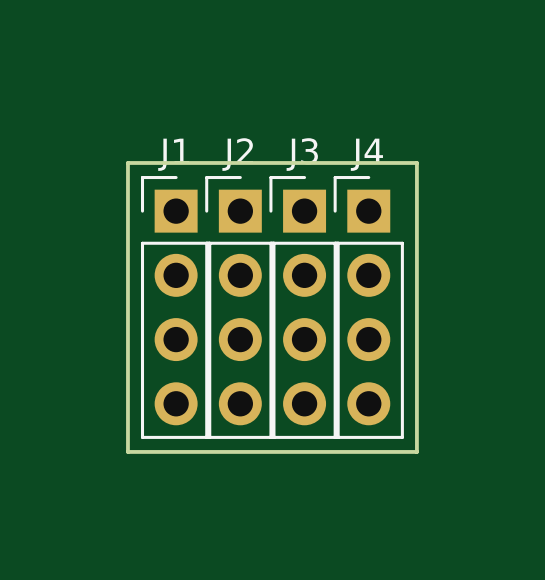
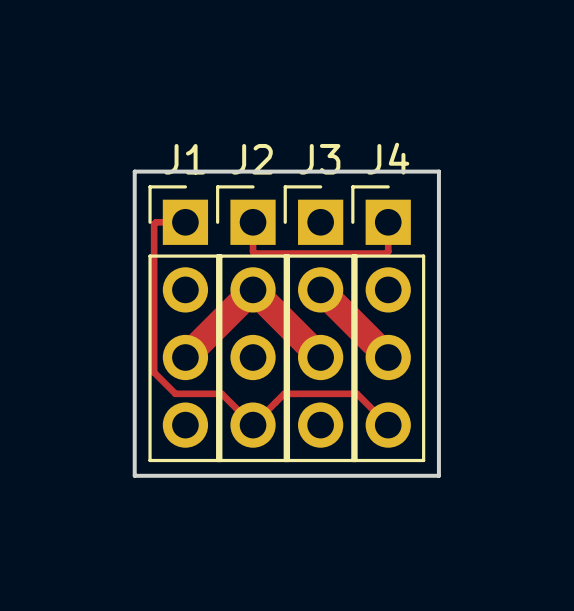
track: none -> (185, 222) (156, 222) (154, 224) (154, 372) (175, 393) (221, 393) (253, 425) (284, 393) (356, 393) (388, 425)
track: none -> (253, 222) (253, 251) (255, 253) (386, 253) (388, 251) (388, 222)
track: none -> (320, 289) (388, 357)
track: none -> (185, 357) (253, 289) (320, 357)

